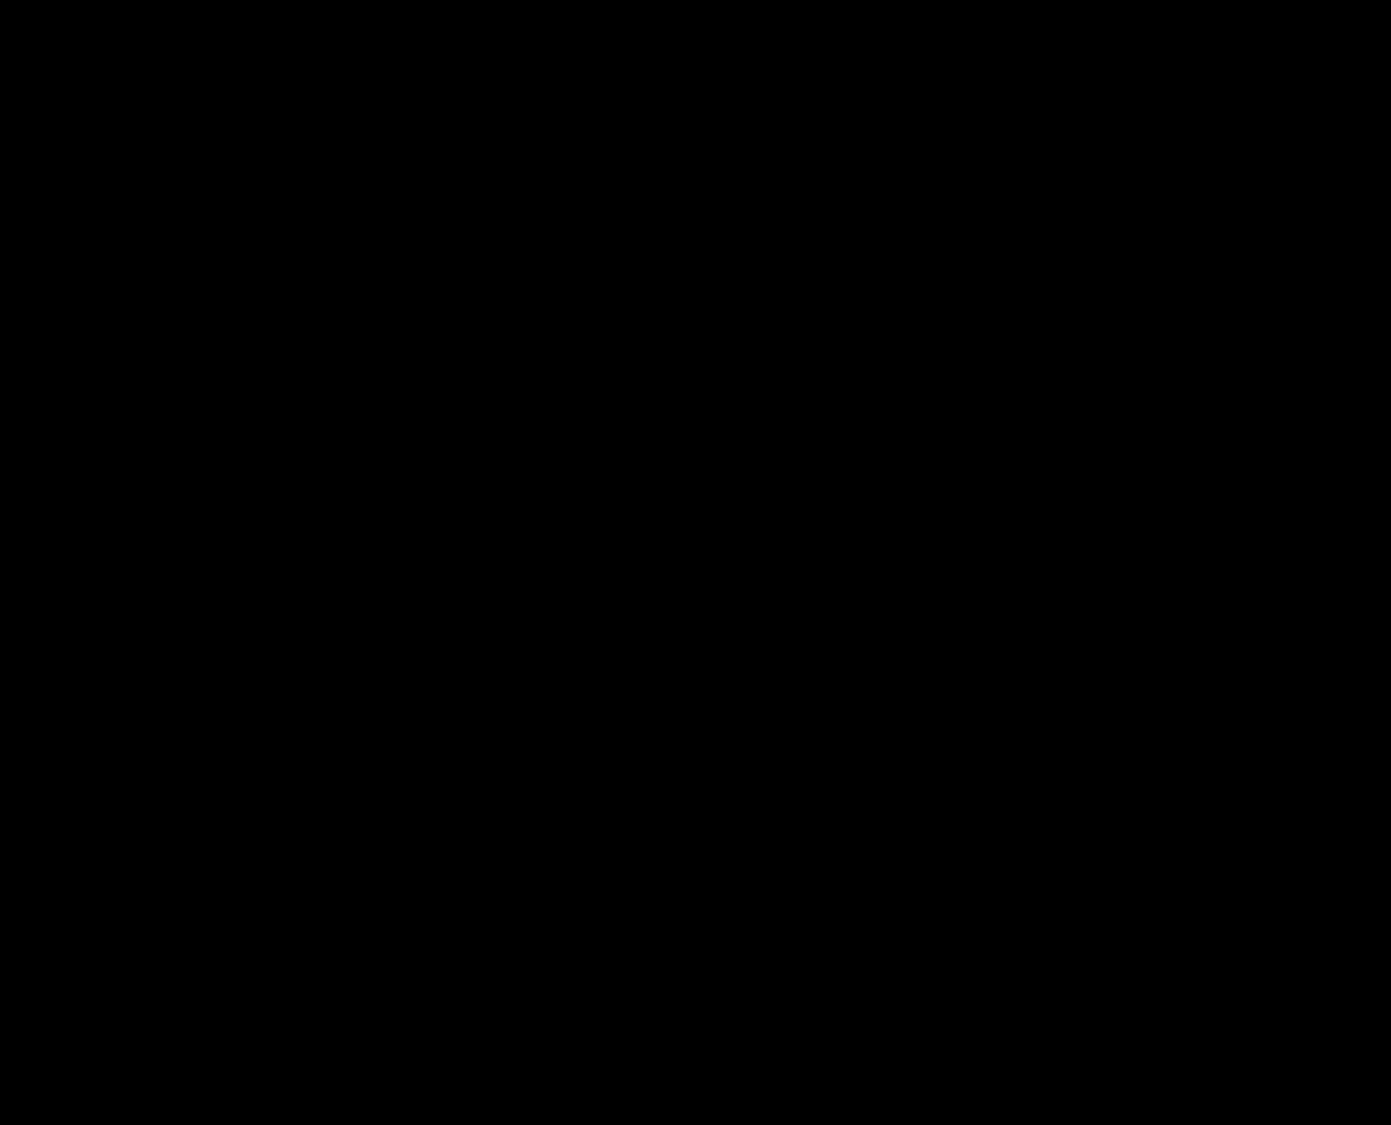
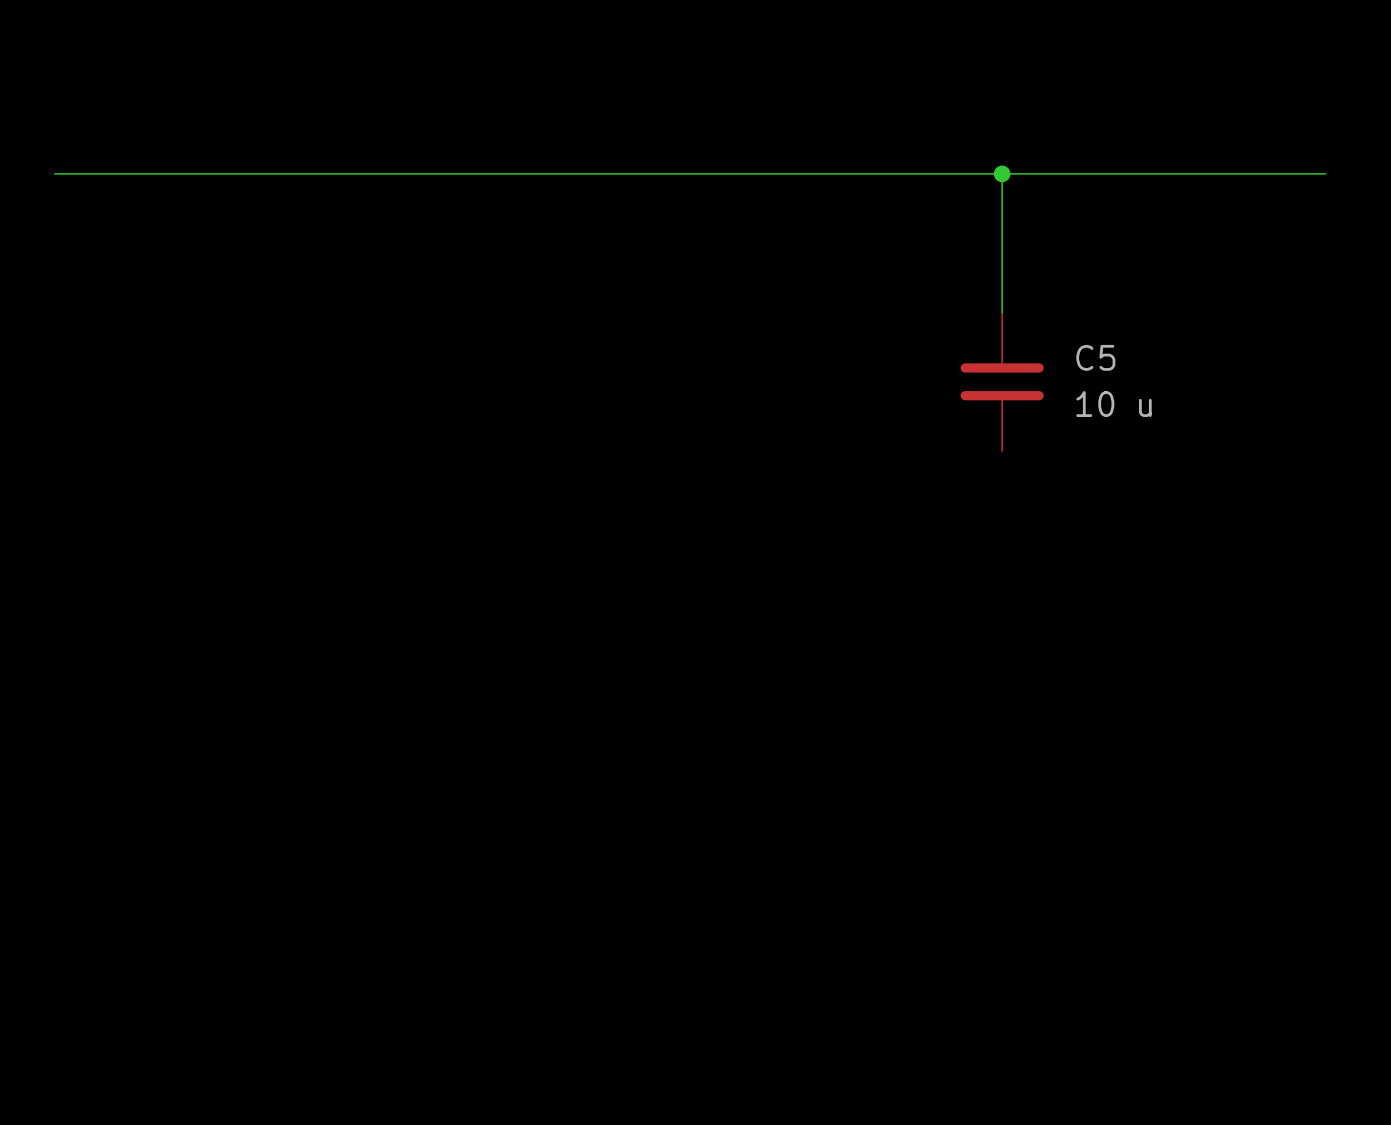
wire: none -> (54, 173) (1325, 173)
wire: none -> (1002, 173) (1002, 312)
junction: none -> (1002, 173)
C5: none -> 10 u (1002, 381)

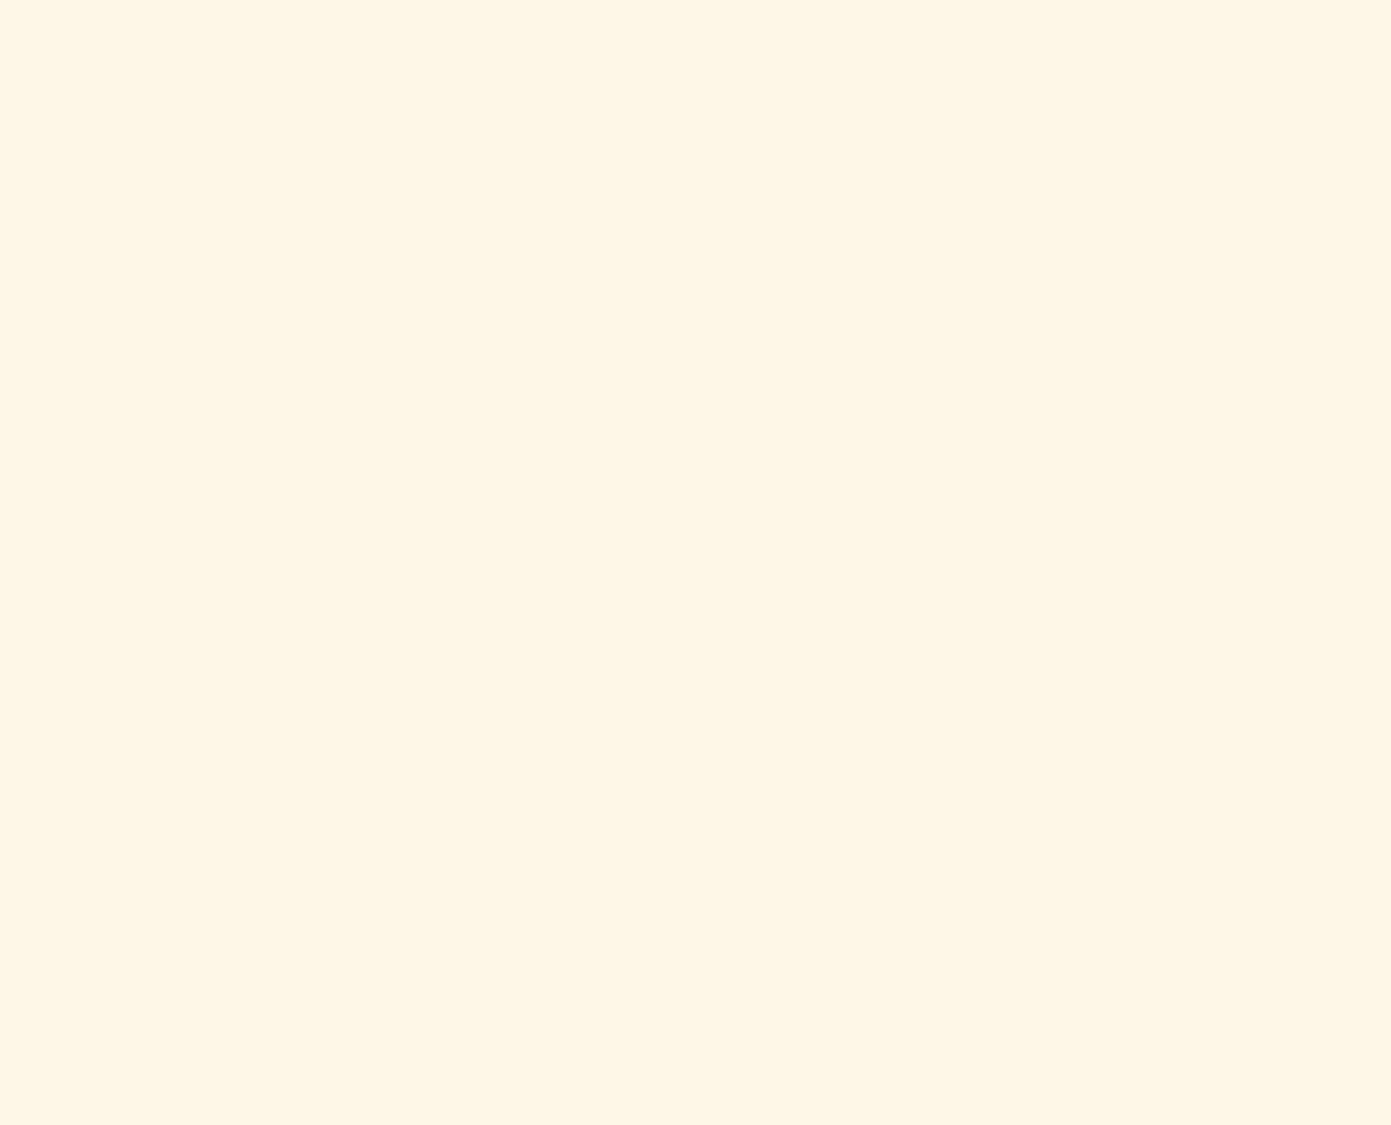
wire: (54, 173) (1325, 173) -> none
wire: (1002, 173) (1002, 312) -> none
junction: (1002, 173) -> none
C5: 10 u (1002, 381) -> none

